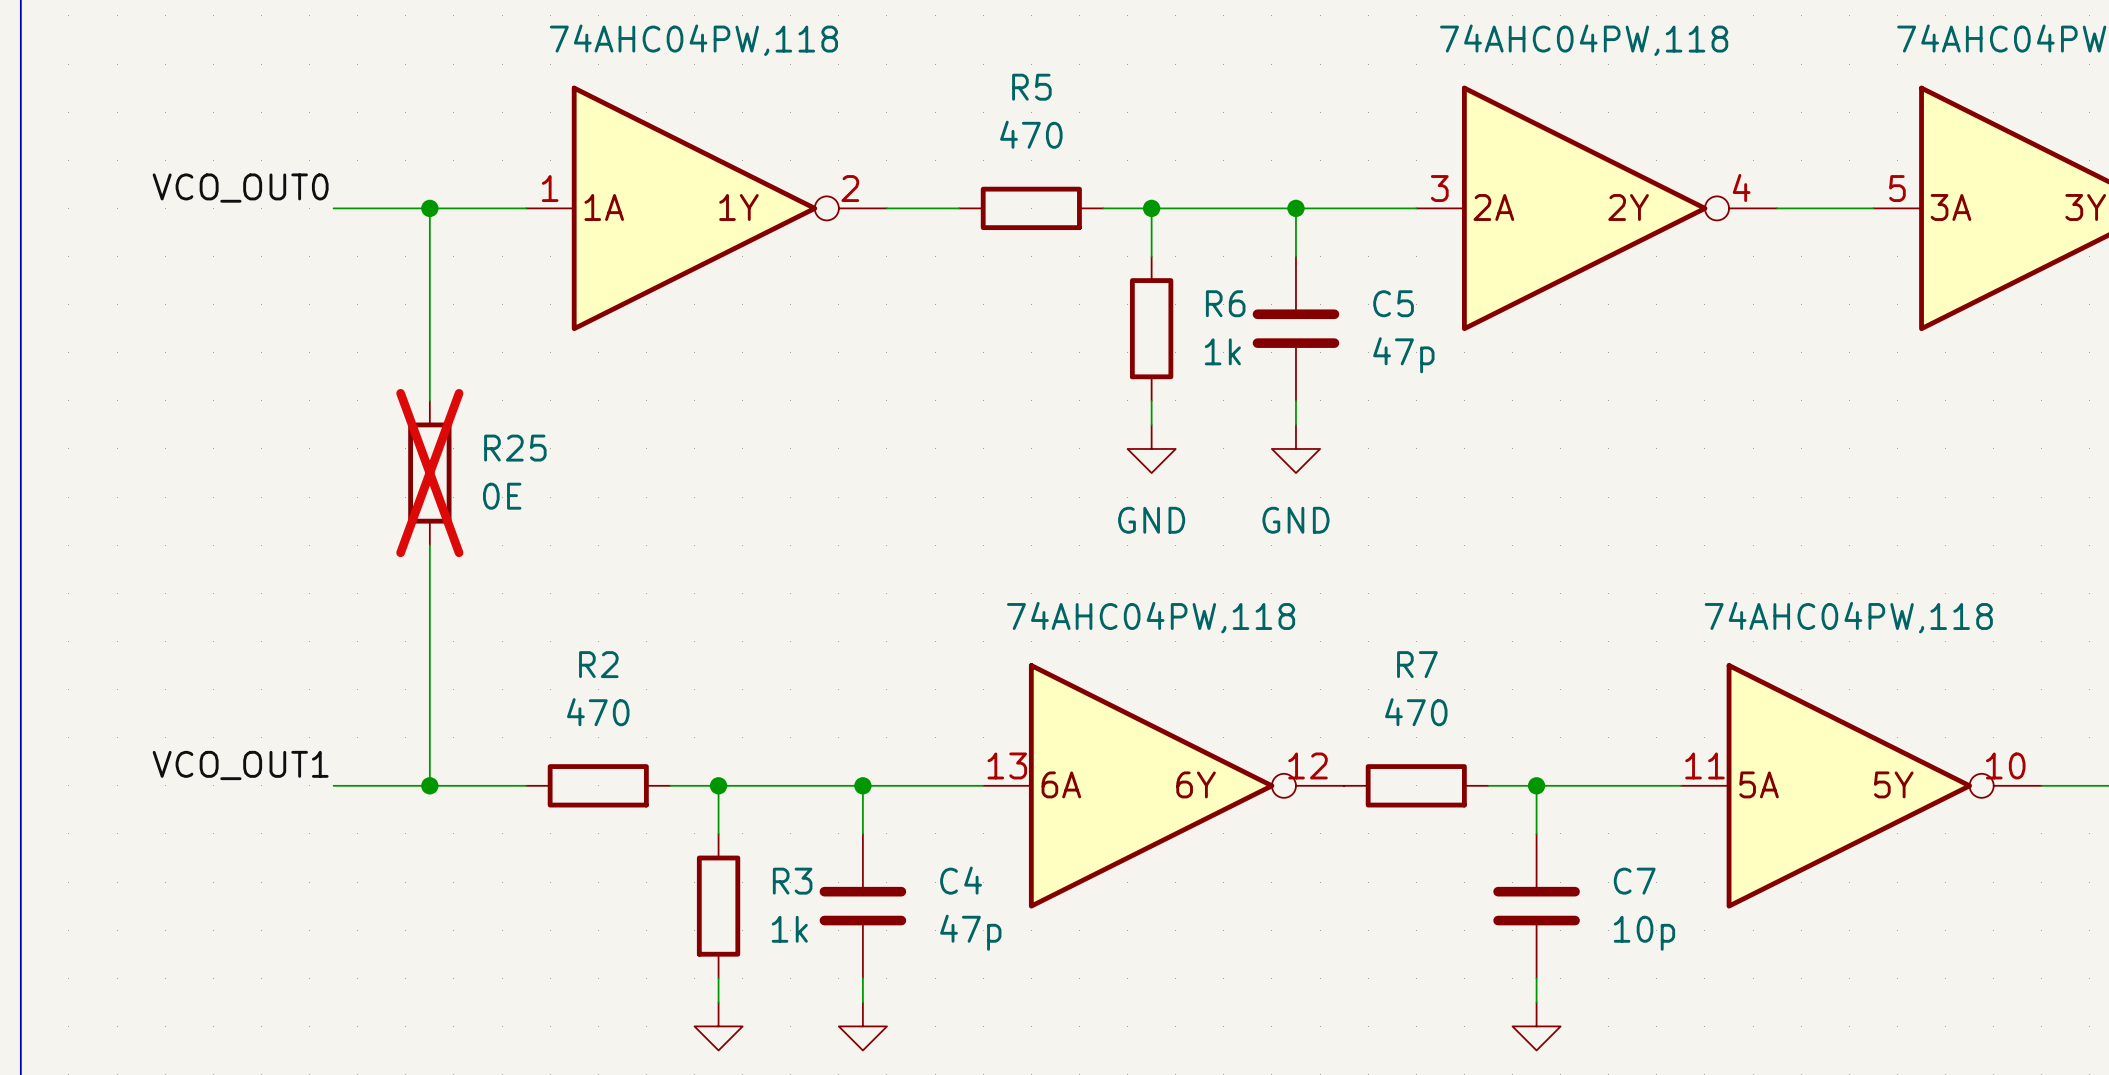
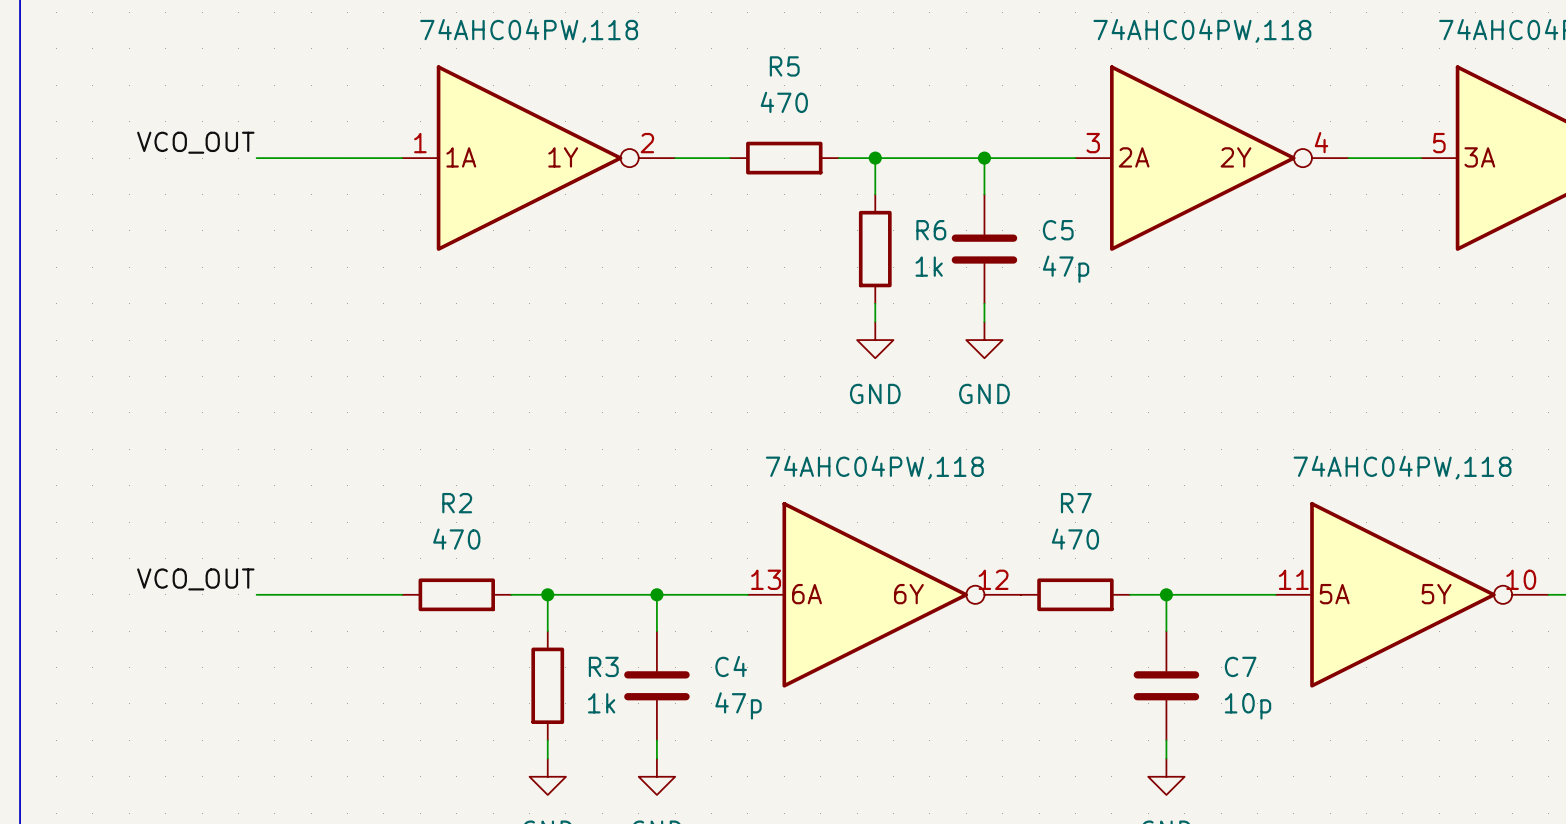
label: VCO_OUT0 (240, 188) -> VCO_OUT (195, 142)
wire: (429, 208) (429, 400) -> none
junction: (429, 208) -> none
R25: 0E (429, 473) -> none
wire: (429, 545) (429, 785) -> none
label: VCO_OUT1 (240, 765) -> VCO_OUT (195, 579)
junction: (429, 785) -> none

